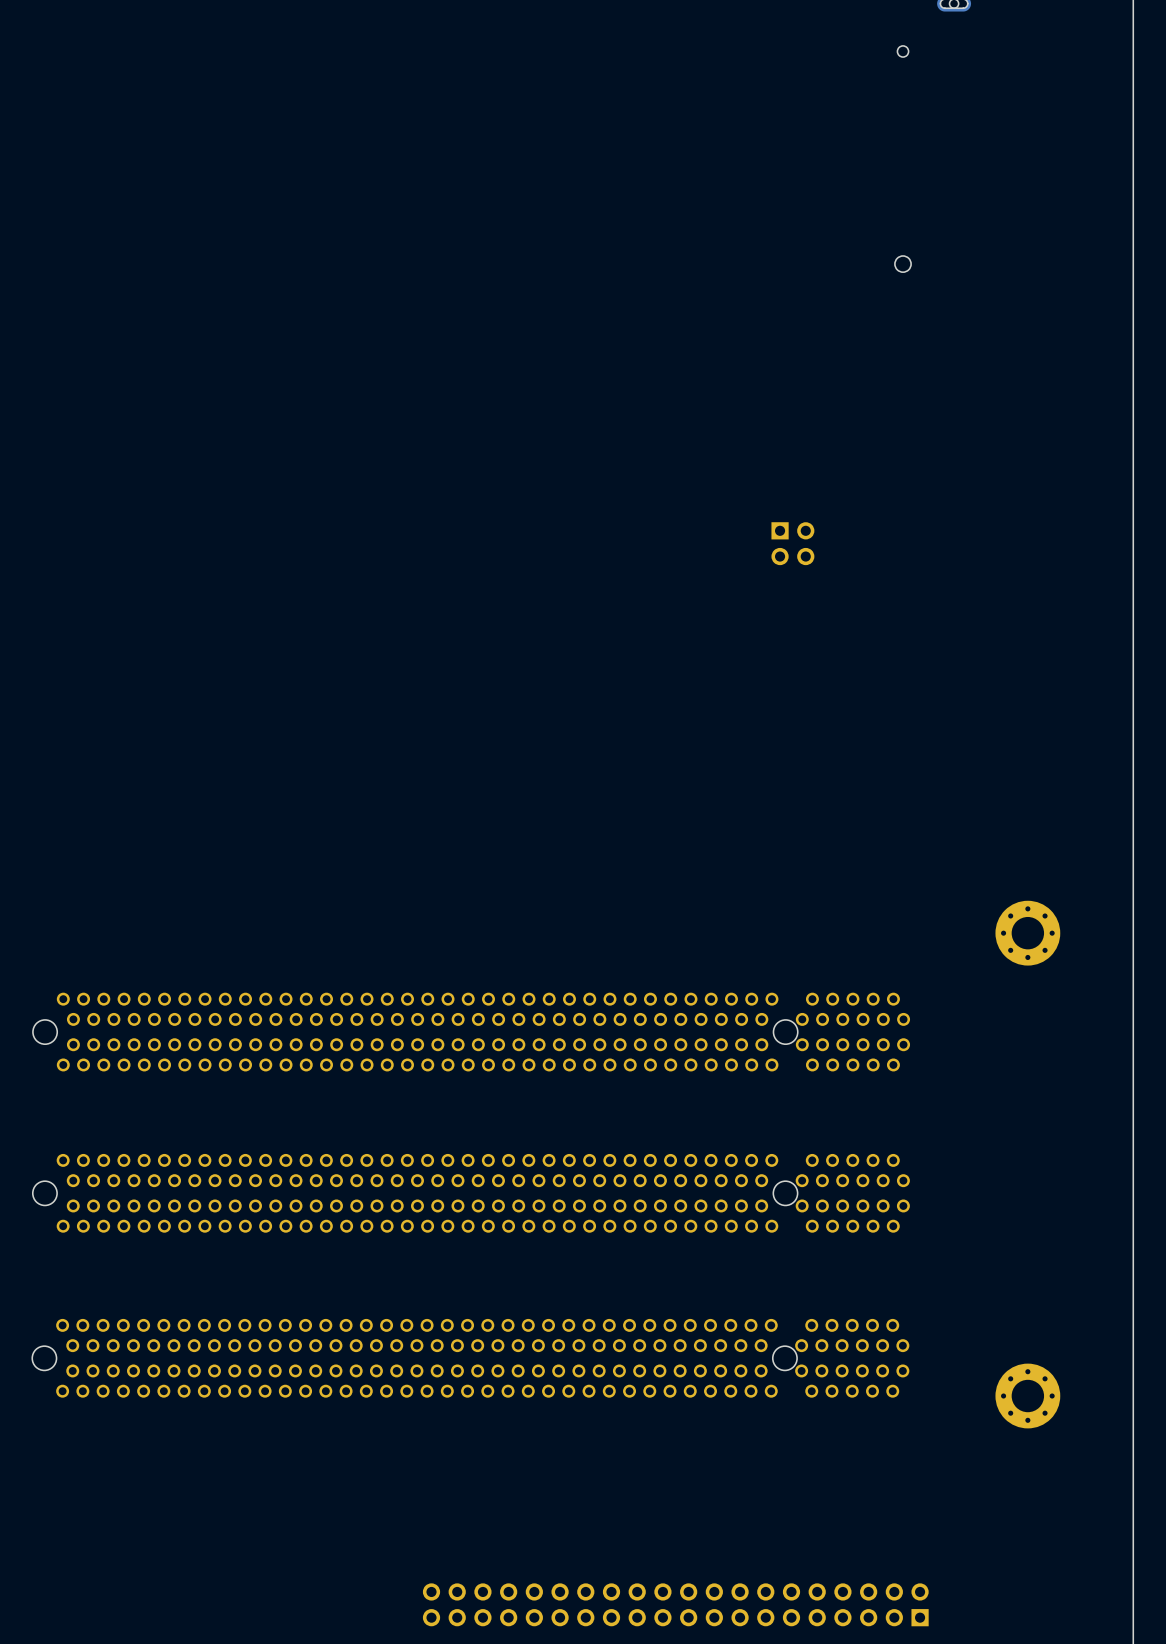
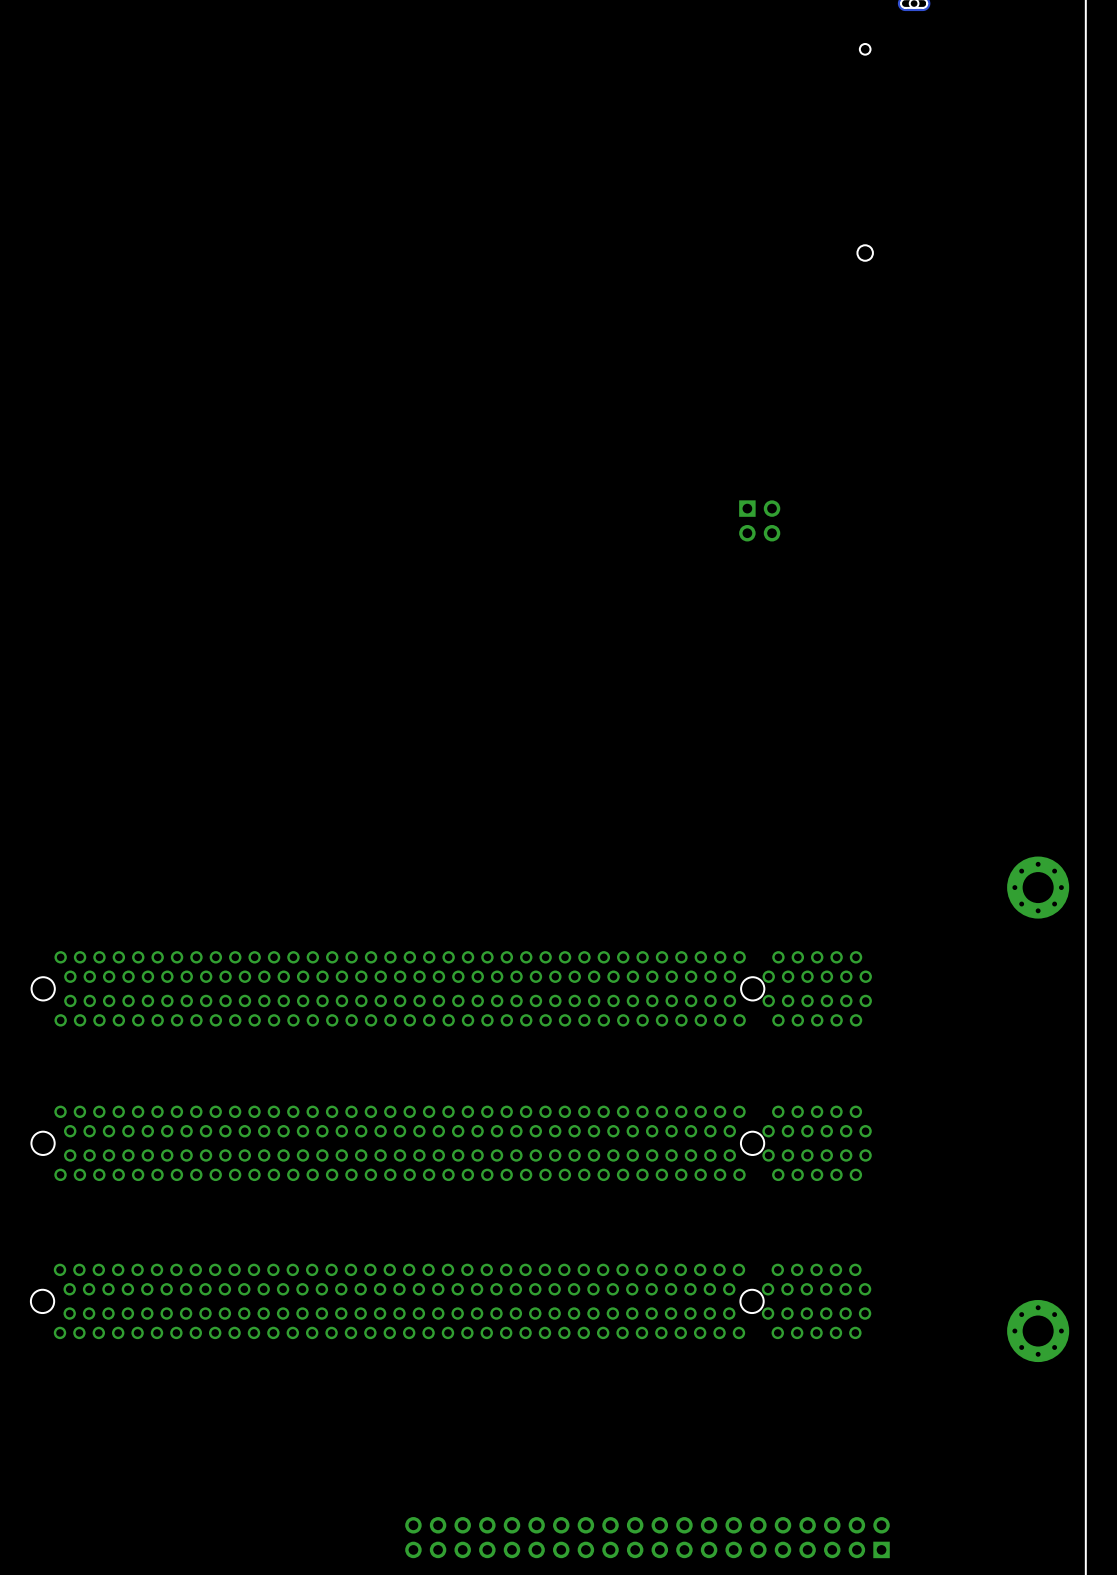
part position: (1027, 933) -> (1038, 887)
part position: (1027, 1396) -> (1038, 1331)

